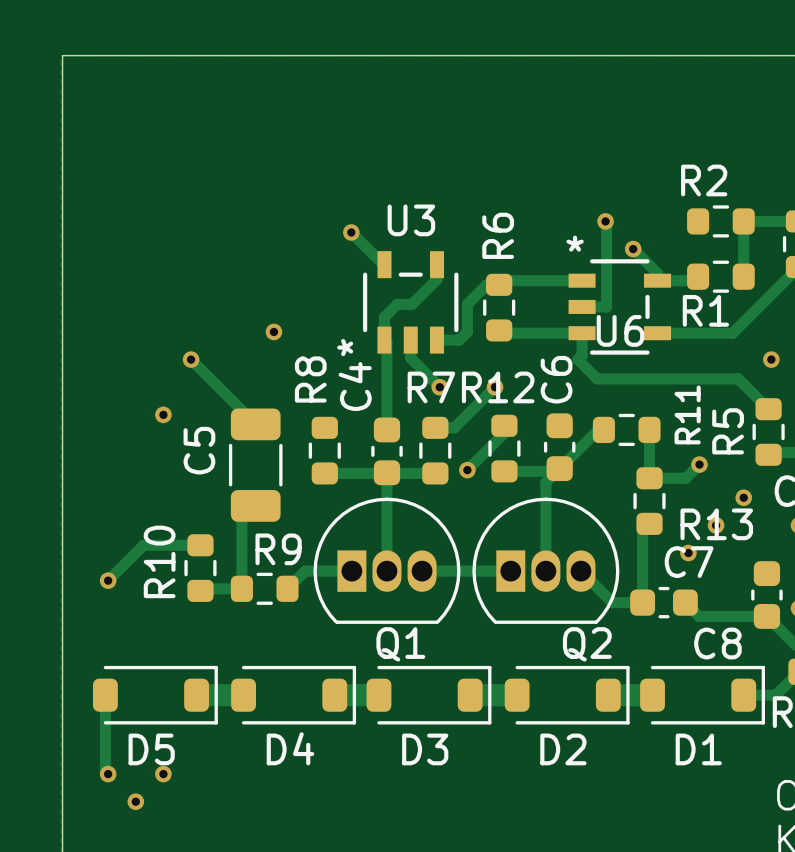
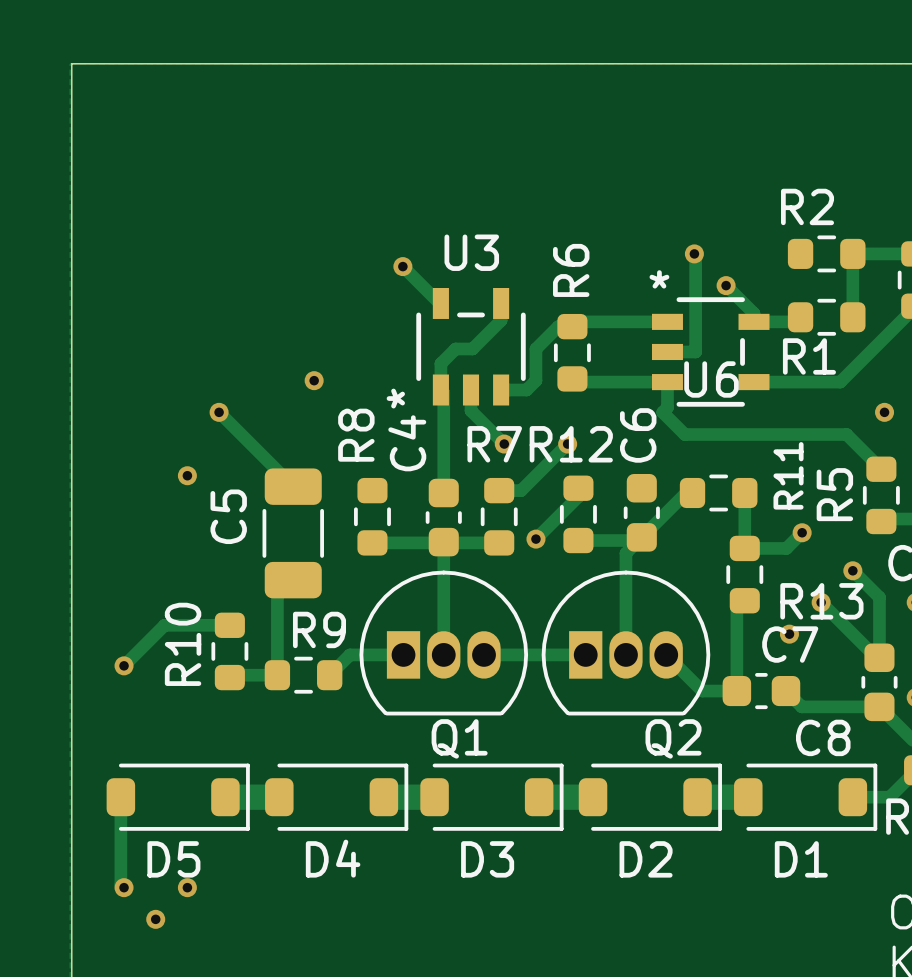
track: none -> (852, 570) (879, 597) (879, 657)
track: none -> (821, 602) (876, 657)

